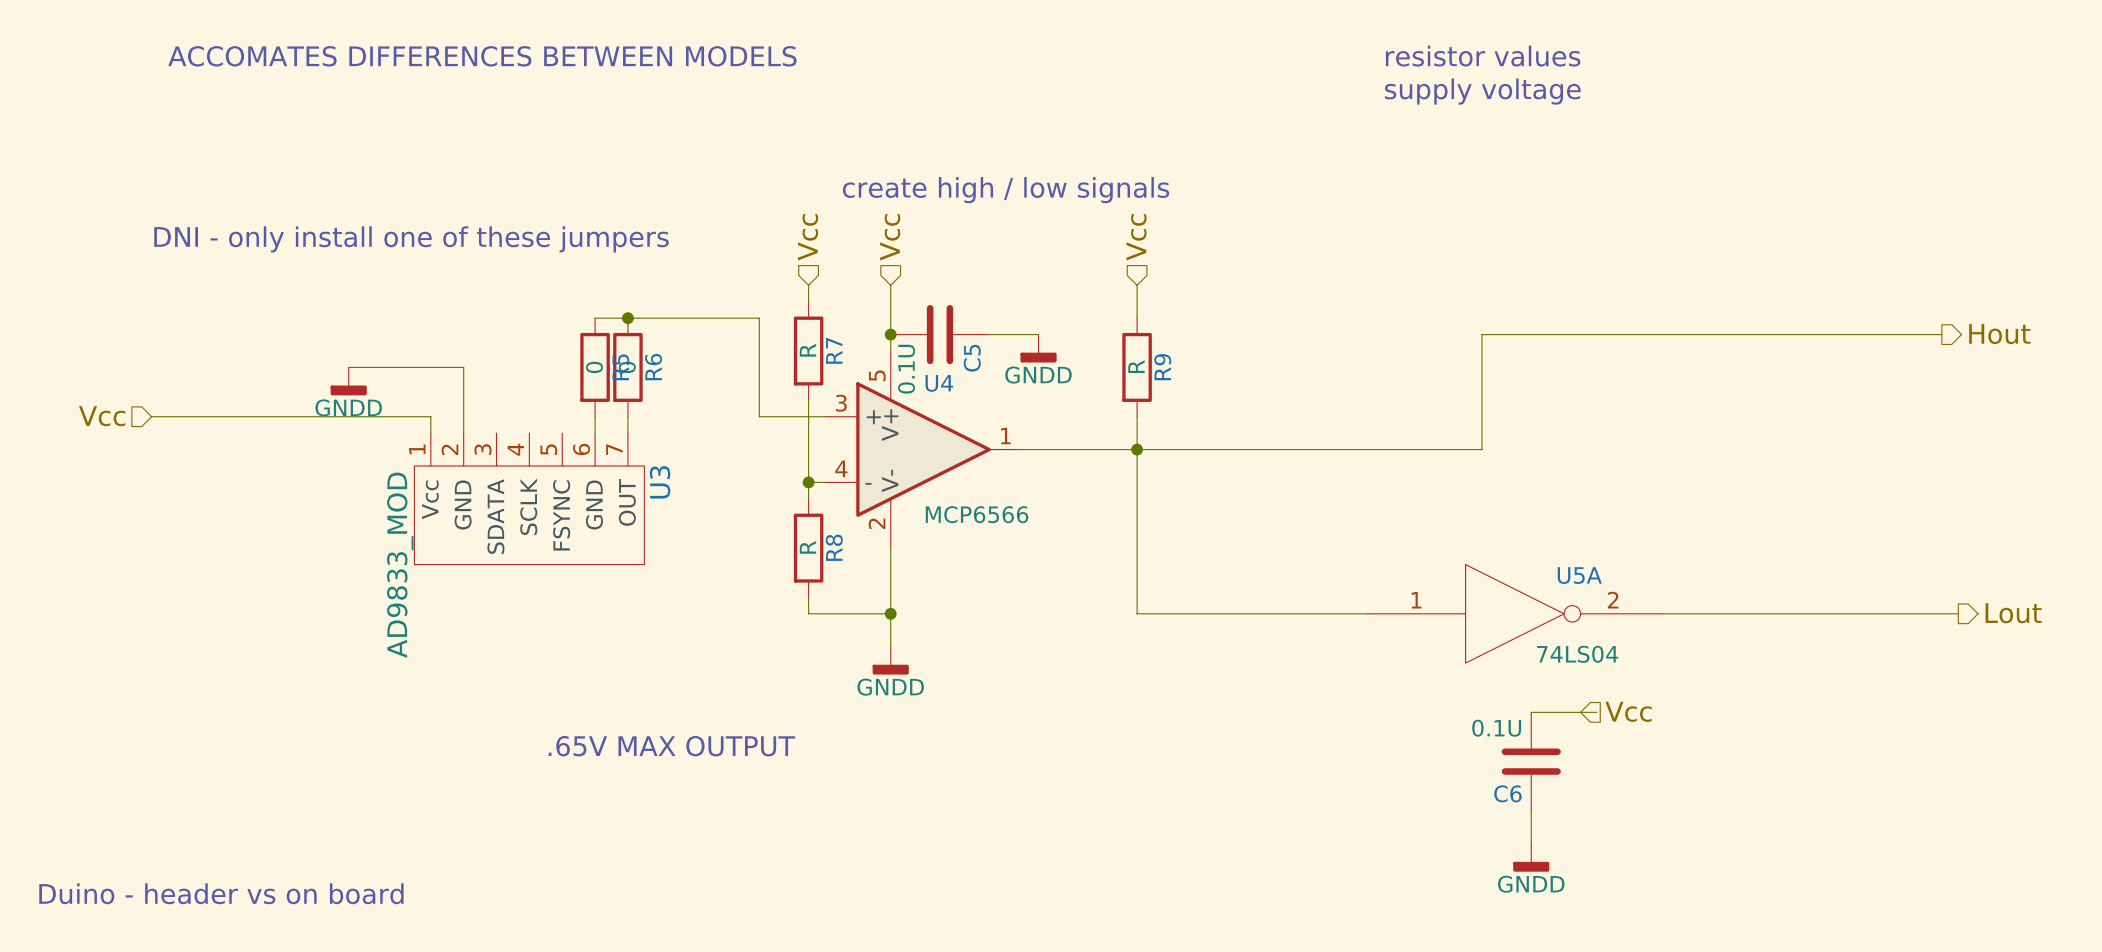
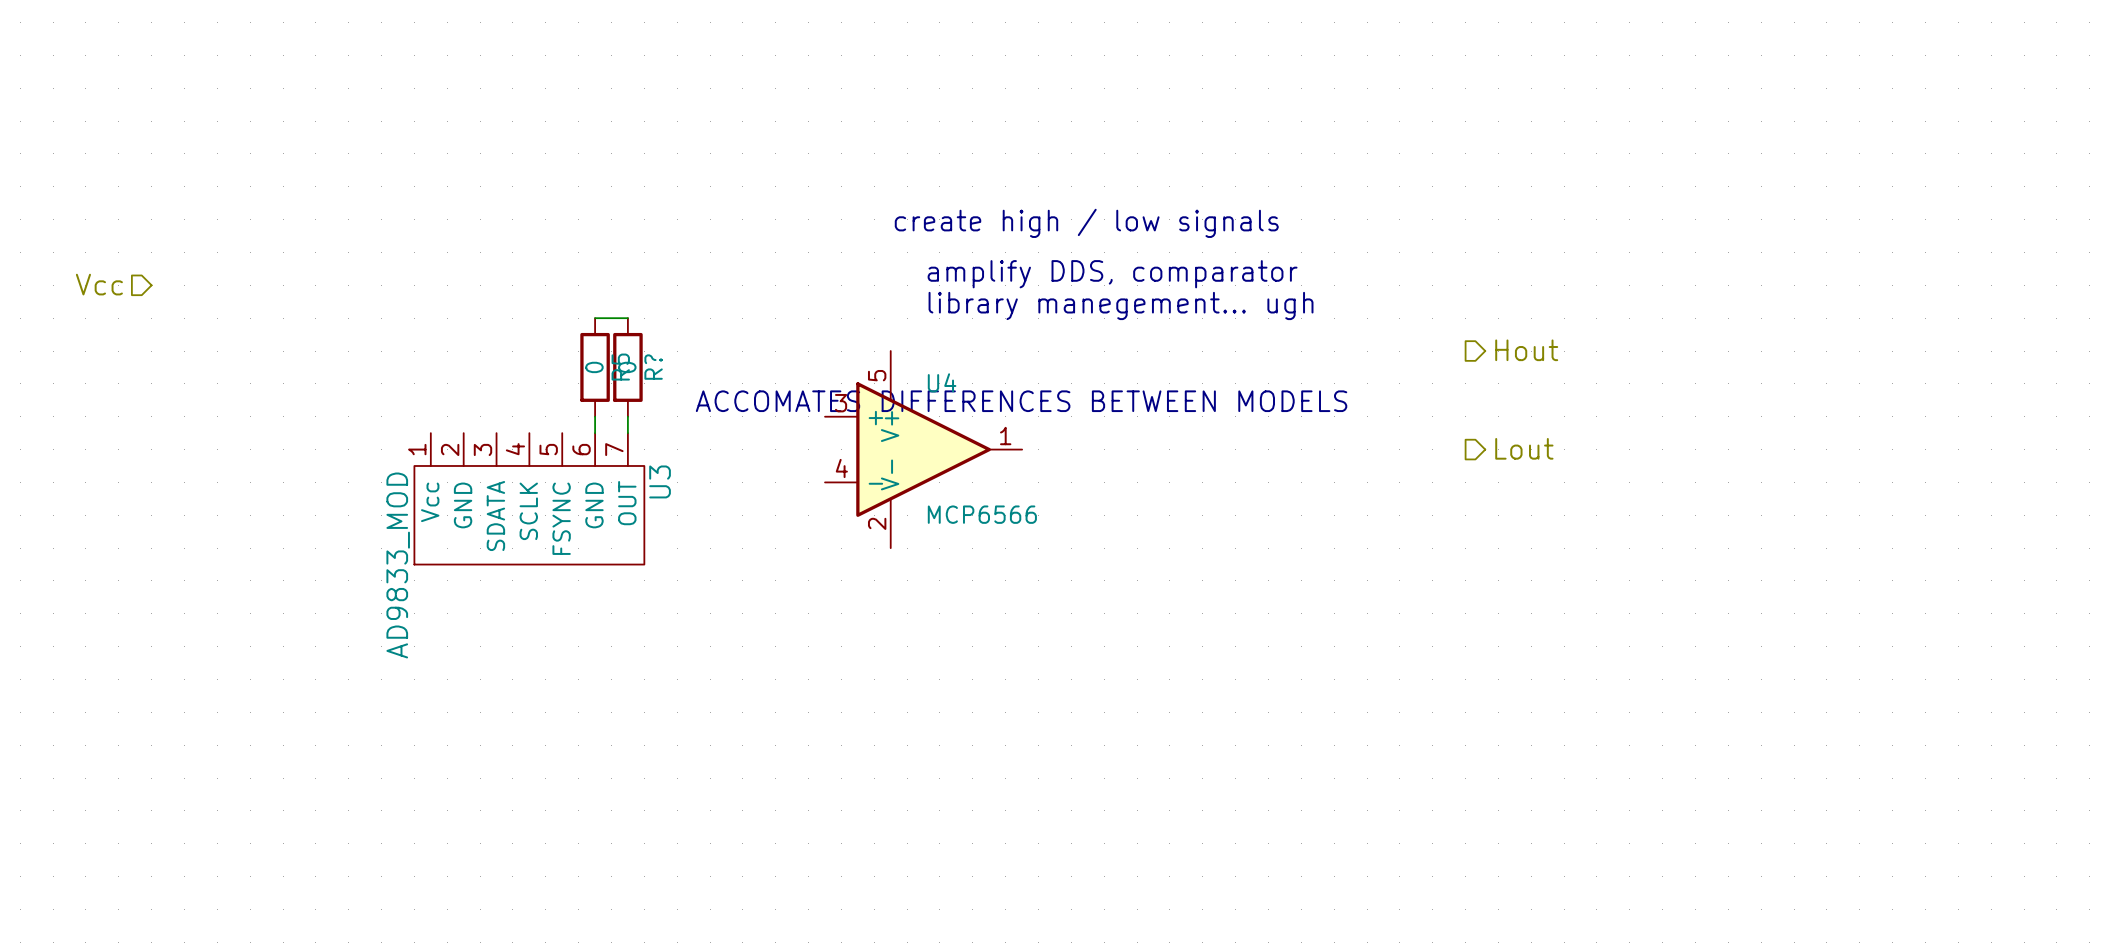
text: ACCOMATES DIFFERENCES BETWEEN MODELS (482, 56) -> none
text: resistor values (1483, 56) -> none
text: supply voltage (1482, 91) -> none
text position: create high / low signals (1006, 190) -> create high / low signals (1086, 223)
hierarchical label: Vcc (808, 237) -> none
hierarchical label: Vcc (890, 237) -> none
hierarchical label: Vcc (1136, 237) -> none
text: DNI - only install one of these jumpers (411, 239) -> none
text: none -> amplify DDS, comparator (1112, 274)
wire: (808, 285) (808, 301) -> none
wire: (890, 285) (890, 351) -> none
wire: (1137, 285) (1137, 318) -> none
text: none -> library manegement... ugh (1121, 305)
wire: (627, 318) (759, 318) (759, 416) (825, 416) -> none
junction: (627, 318) -> none
junction: (890, 334) -> none
C5: 0.1U (939, 334) -> none
wire: (989, 334) (1038, 334) -> none
wire: (1941, 334) (1482, 334) (1482, 449) (1022, 449) -> none
hierarchical label: Hout (1999, 334) -> none
power symbol: GNDD (1038, 348) -> none
hierarchical label: none -> Hout (1526, 350)
R7: R (808, 351) -> none
wire: (348, 367) (463, 367) (463, 433) -> none
R6 name: R6 (653, 367) -> R? (653, 367)
R9: R (1137, 367) -> none
power symbol: GNDD (348, 381) -> none
wire: (808, 400) (808, 498) -> none
text: none -> ACCOMATES DIFFERENCES BETWEEN MODELS (1021, 401)
hierarchical label position: Vcc (102, 416) -> Vcc (99, 284)
wire: (151, 416) (430, 416) (430, 433) -> none
wire: (1137, 416) (1137, 613) (1367, 613) -> none
junction: (1137, 449) -> none
hierarchical label: none -> Lout (1524, 448)
wire: (808, 482) (825, 482) -> none
junction: (808, 482) -> none
R8: R (808, 548) -> none
wire: (890, 548) (890, 646) -> none
wire: (808, 597) (808, 613) (890, 613) -> none
junction: (890, 613) -> none
U5A: 74LS04 (1514, 613) -> none
wire: (1662, 613) (1958, 613) -> none
hierarchical label: Lout (2013, 613) -> none
power symbol: GNDD (890, 660) -> none
hierarchical label: Vcc (1628, 711) -> none
wire: (1531, 712) (1596, 712) -> none
text: .65V MAX OUTPUT (671, 746) -> none
C6: 0.1U (1531, 761) -> none
wire: (1531, 810) (1531, 843) -> none
power symbol: GNDD (1531, 857) -> none
text: Duino - header vs on board (221, 893) -> none

